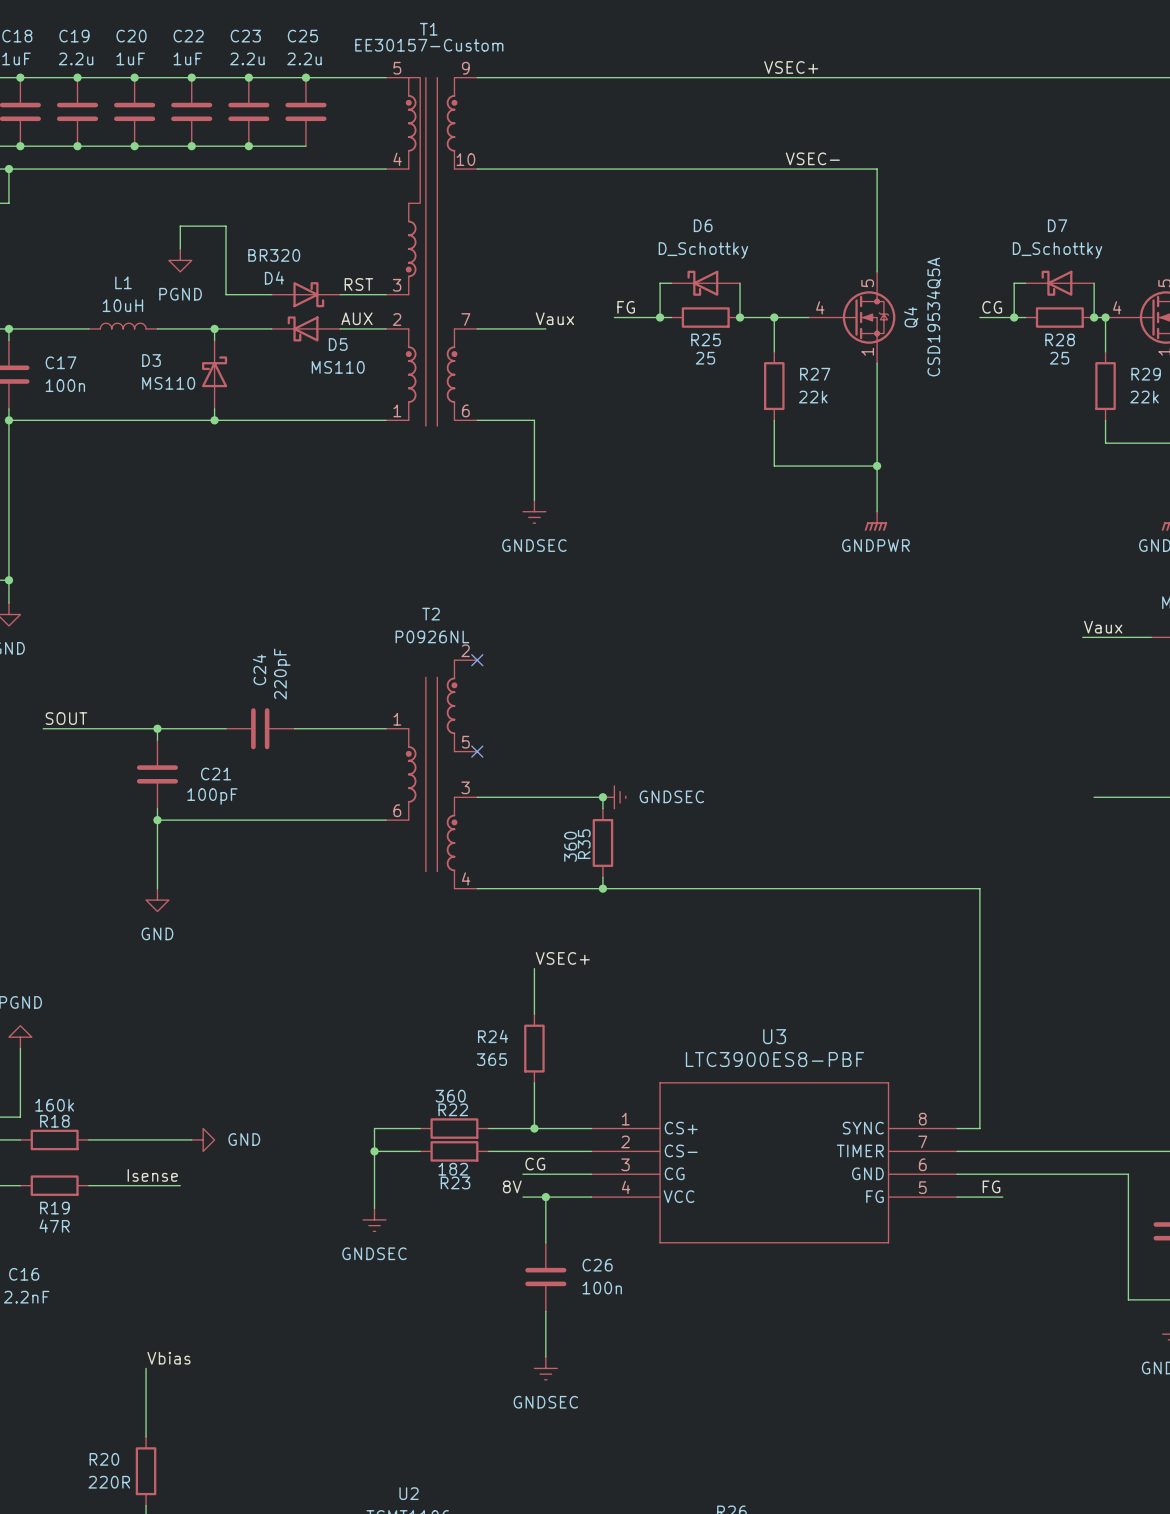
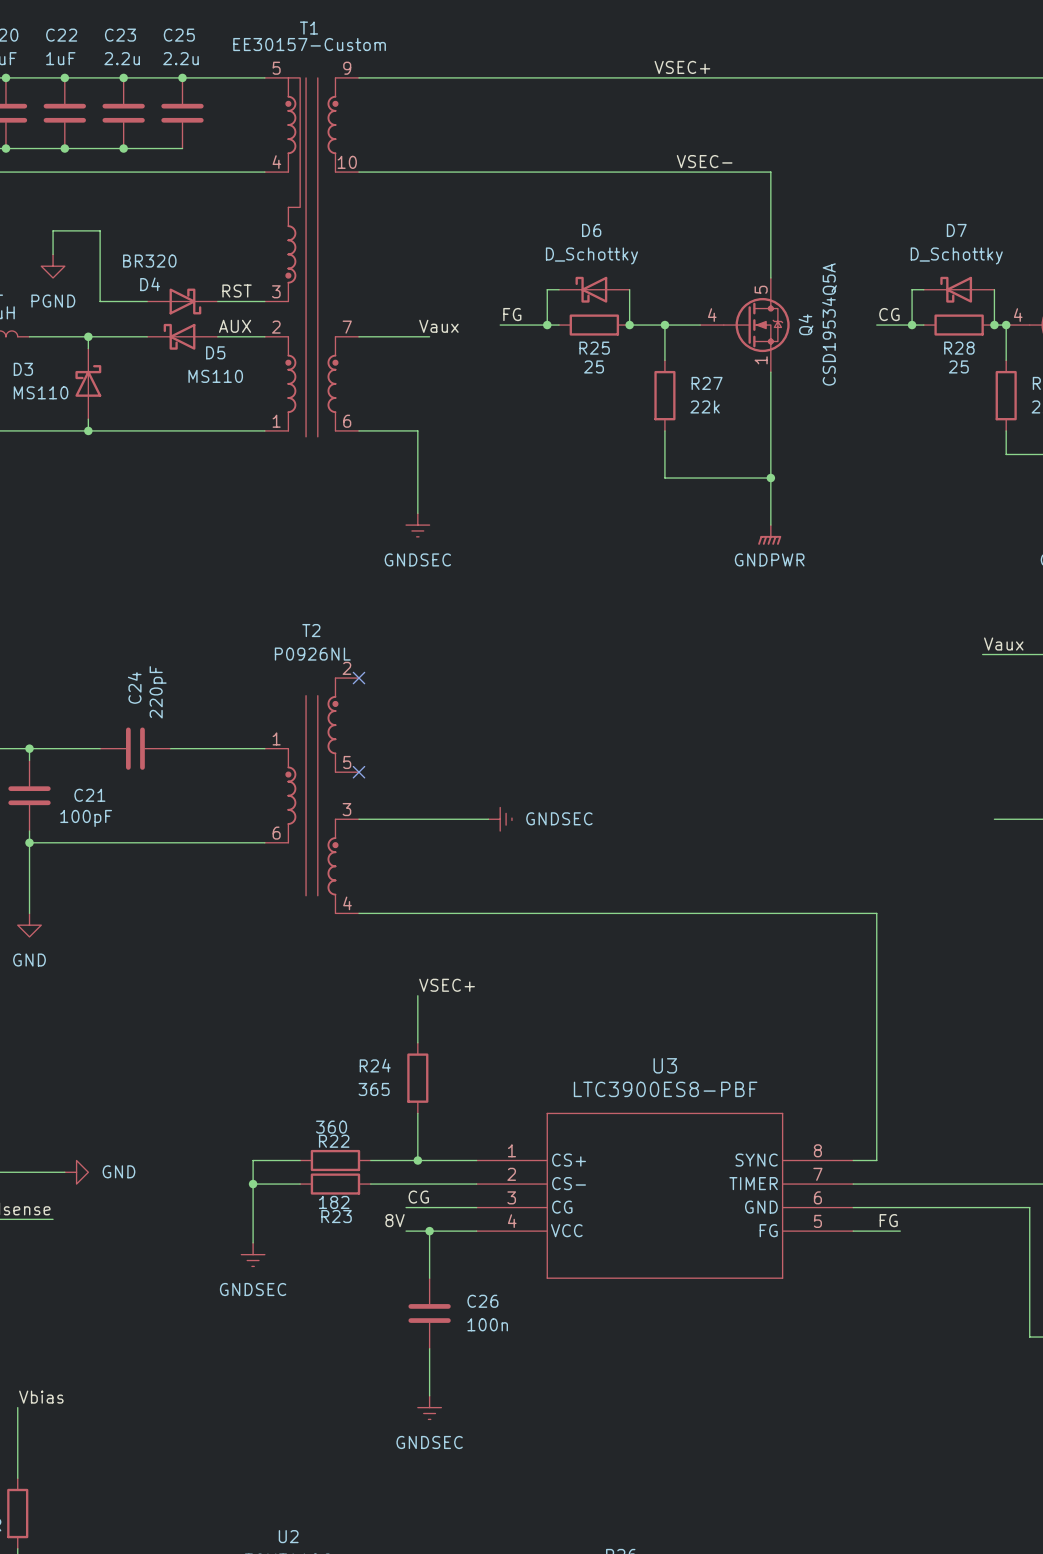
wire: (602, 797) (602, 808) -> none
junction: (602, 797) -> none
R35: 360 (602, 842) -> none
wire: (602, 877) (602, 888) -> none
junction: (602, 888) -> none

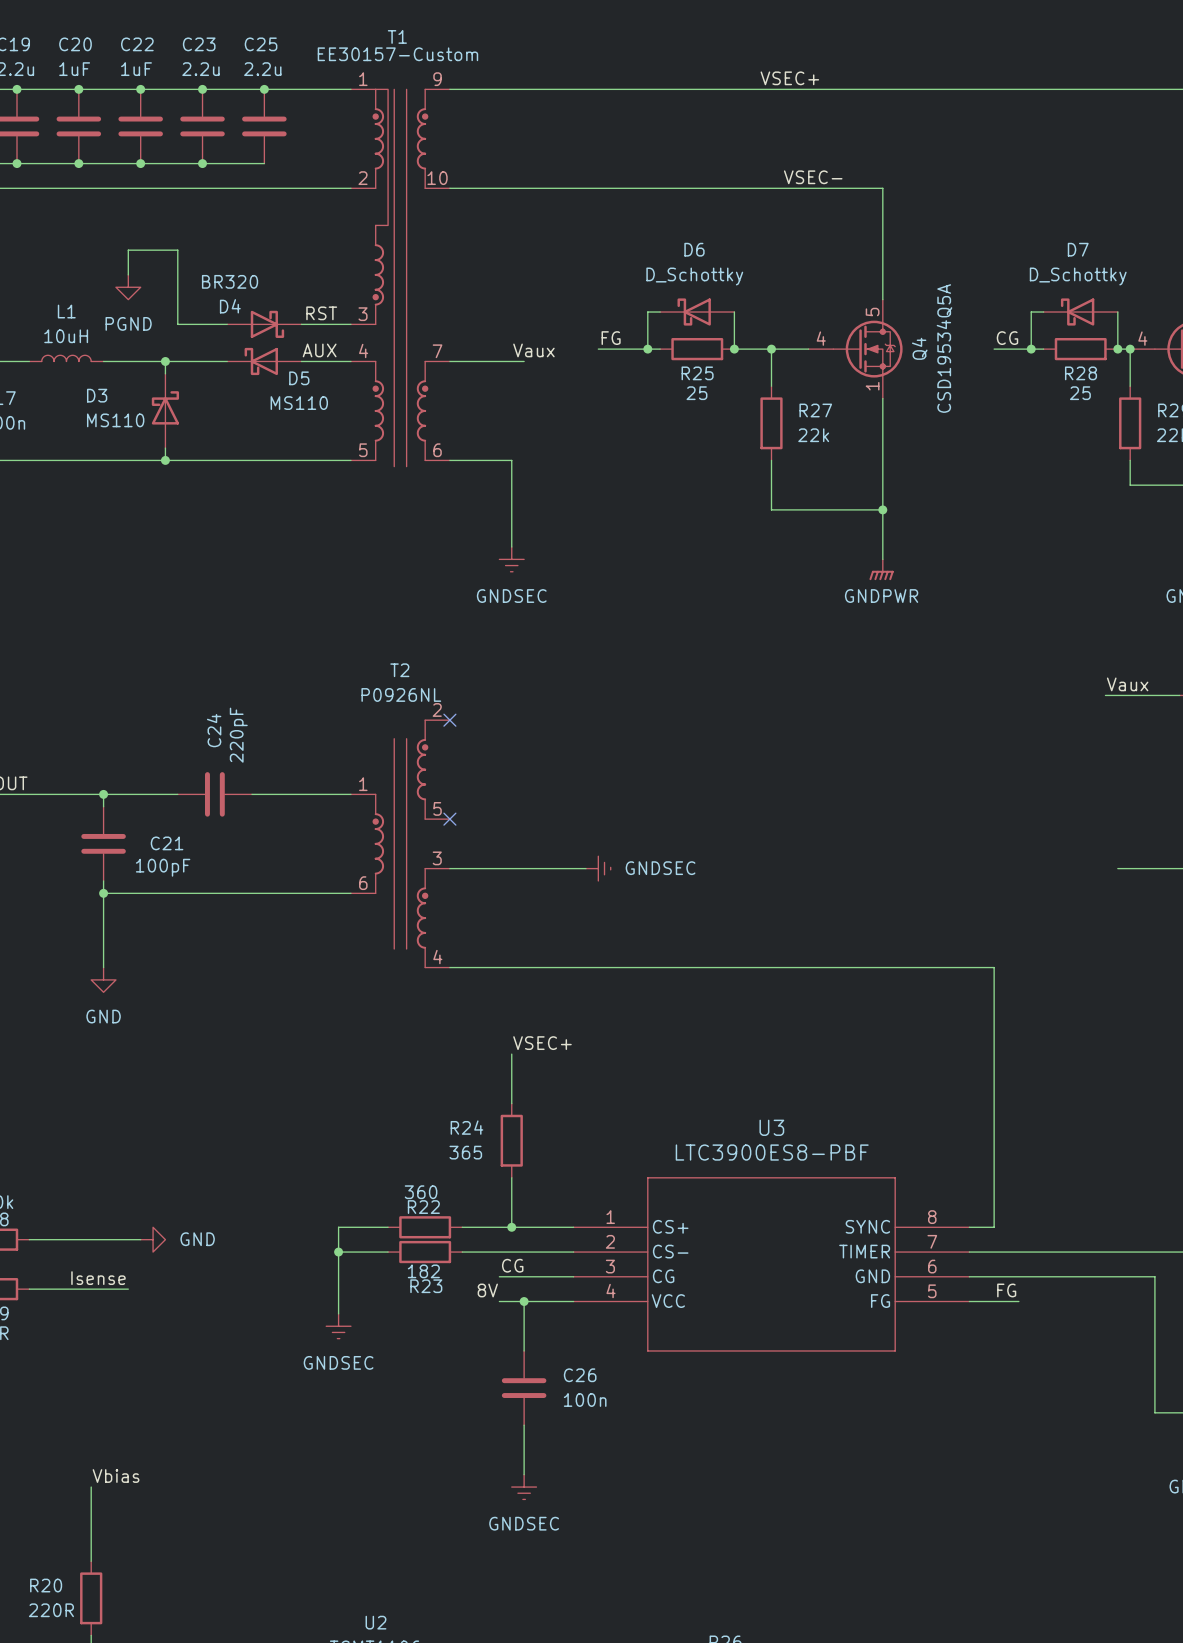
T1 pin number: 5 (276, 68) -> 1 (363, 79)
T1 pin number: 4 (276, 162) -> 2 (363, 178)
T1 pin number: 2 (276, 327) -> 4 (363, 350)
T1 pin number: 1 (276, 421) -> 5 (363, 450)

